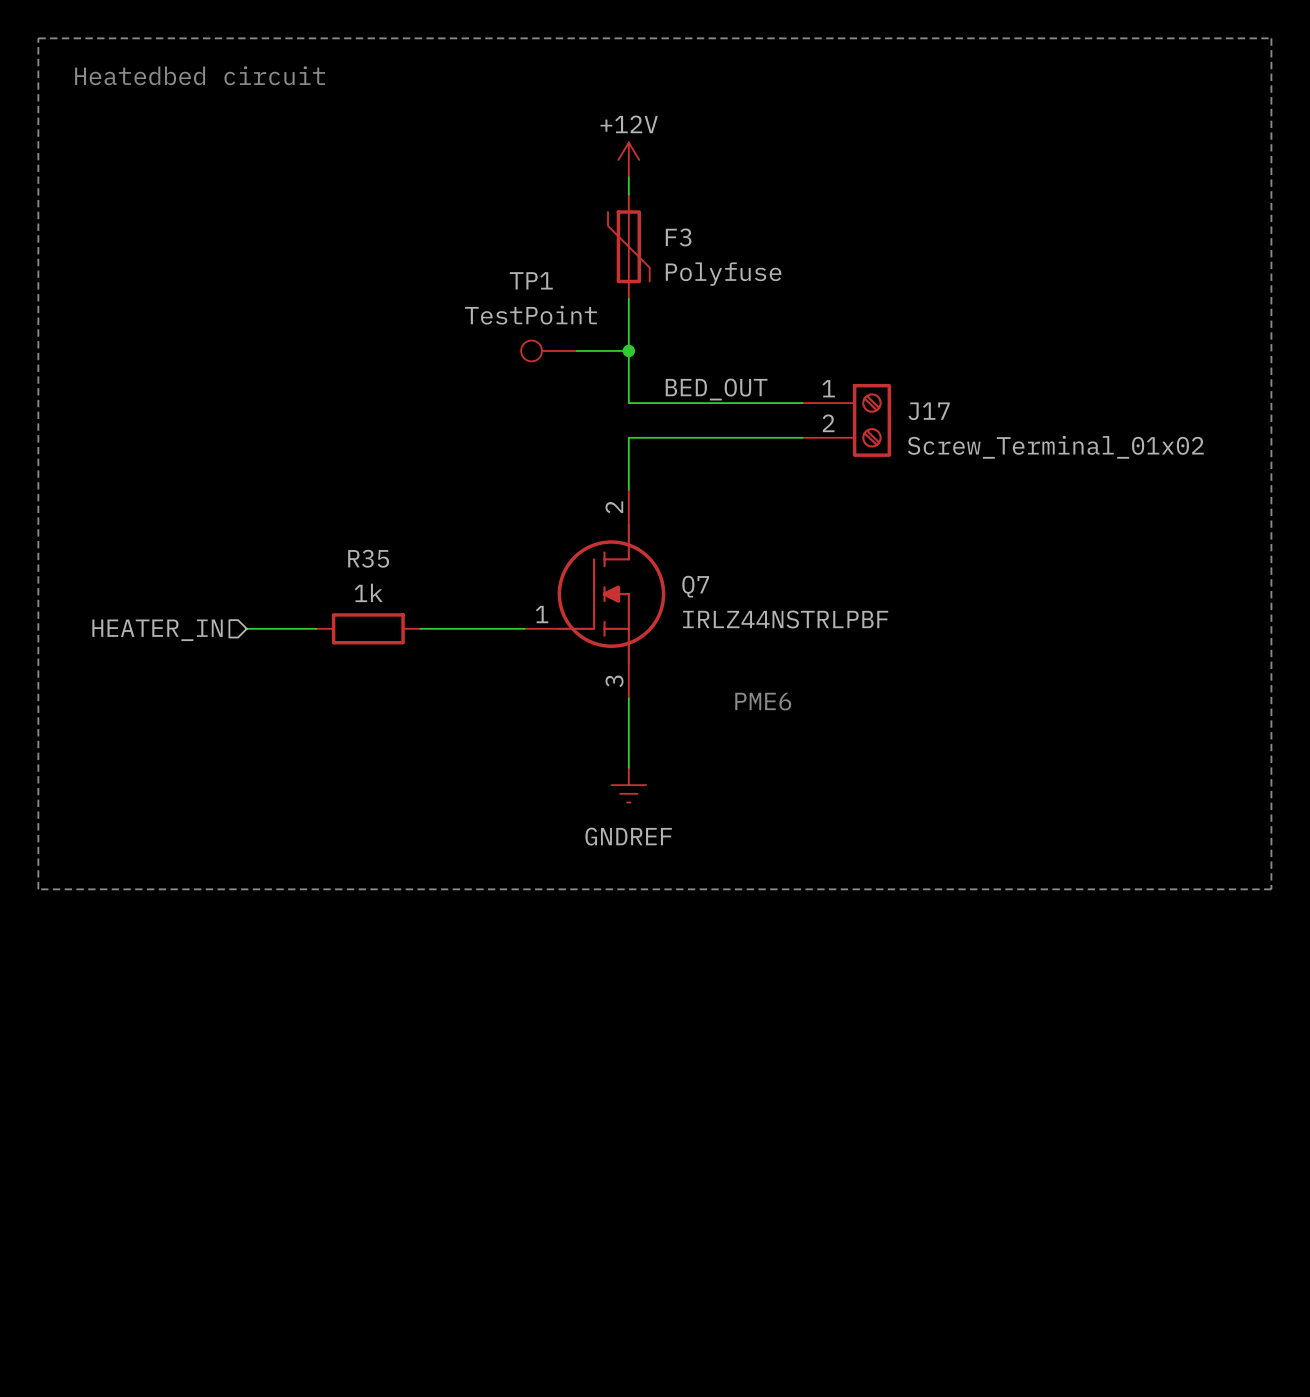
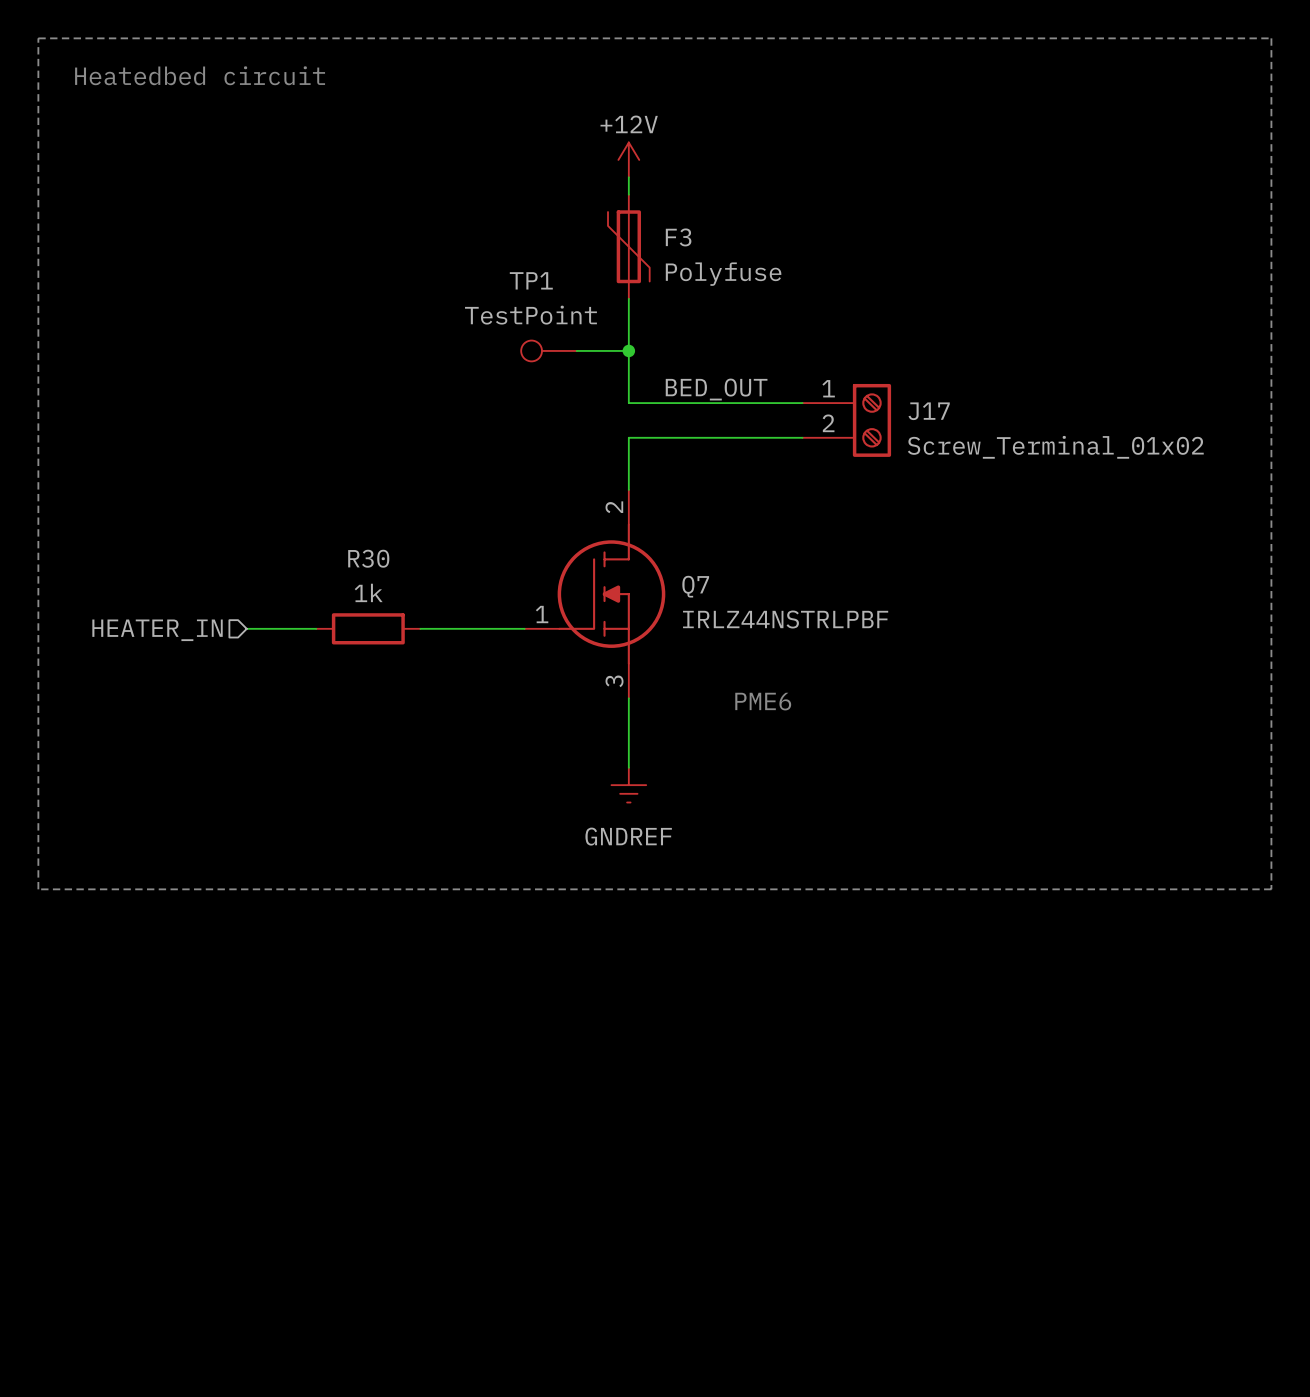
R35 name: R35 (368, 558) -> R30 (368, 558)

